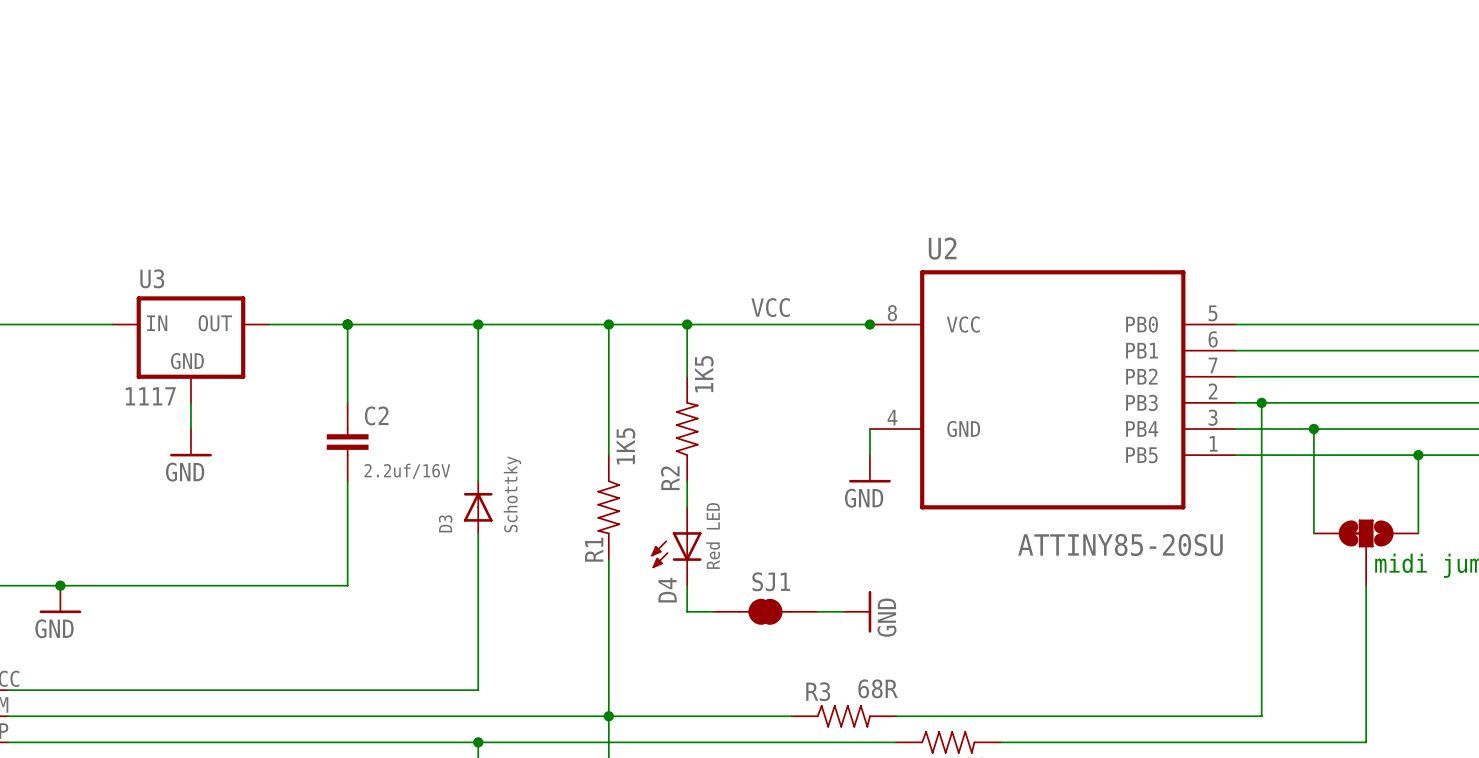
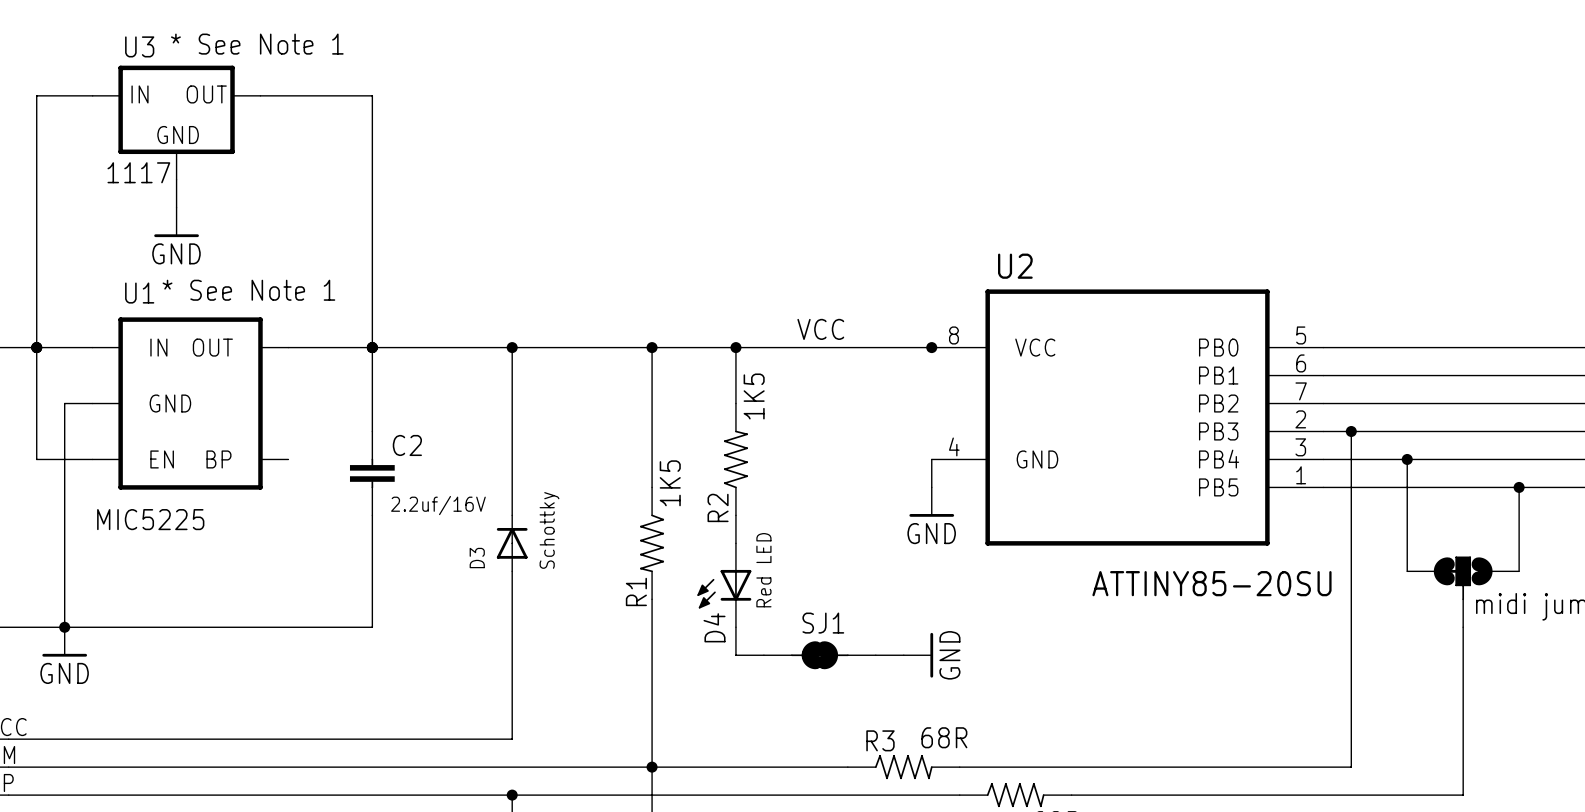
text: none -> * See Note 1 (257, 44)
wire: none -> (92, 95) (36, 95) (36, 459) (92, 459)
wire: none -> (260, 95) (372, 95) (372, 347)
text: none -> * See Note 1 (248, 290)
junction: none -> (36, 347)
U3 position: (190, 349) -> (176, 122)
wire: none -> (92, 403) (64, 403) (64, 627)
U1: none -> MIC5225 (190, 403)
wire: (190, 402) (190, 428) -> (176, 179) (176, 207)
power symbol position: GND (190, 442) -> GND (176, 222)

